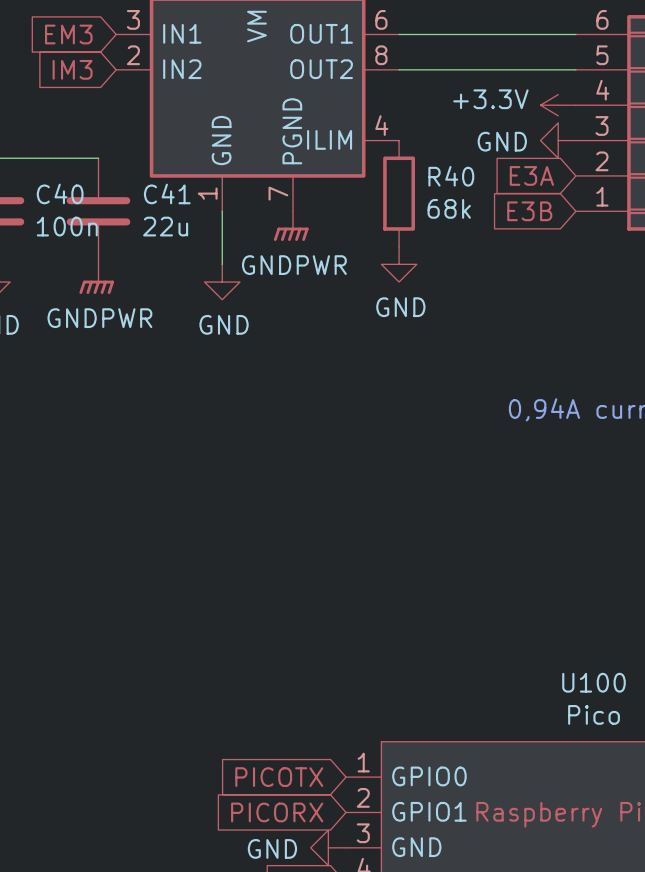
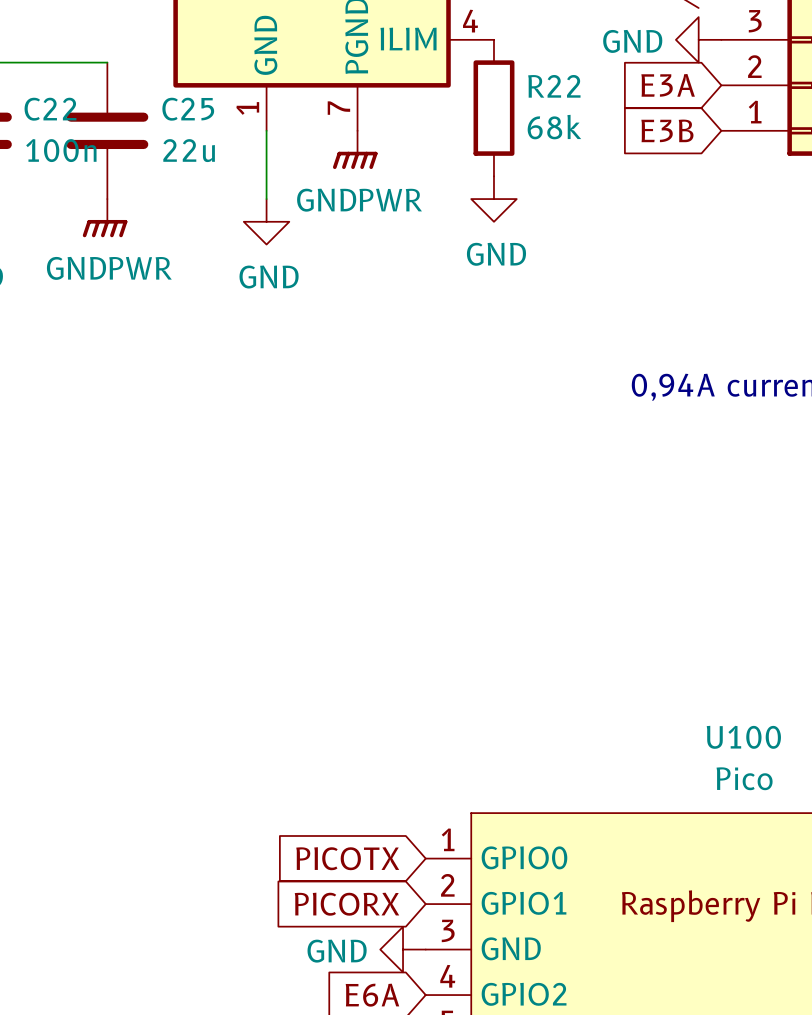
R40 name: R40 (451, 176) -> R22 (554, 86)
C40 name: C40 (60, 193) -> C22 (50, 109)
C41 name: C41 (167, 193) -> C25 (188, 109)

